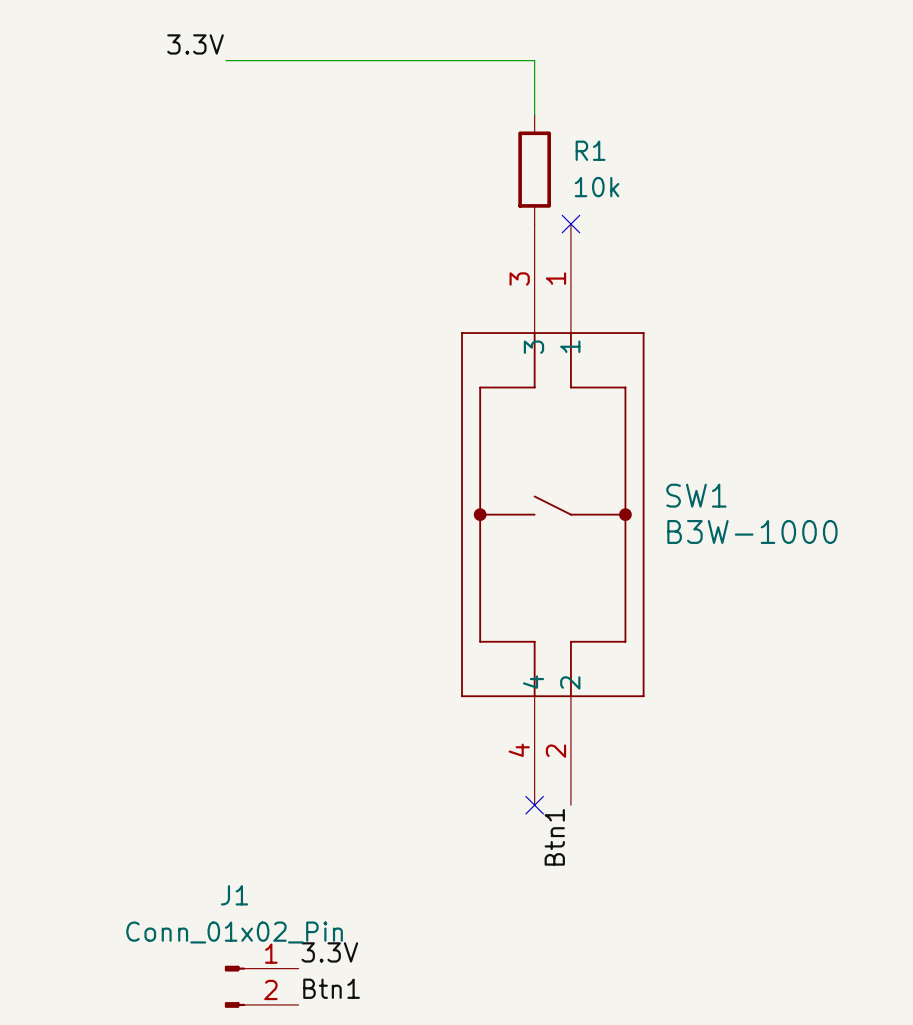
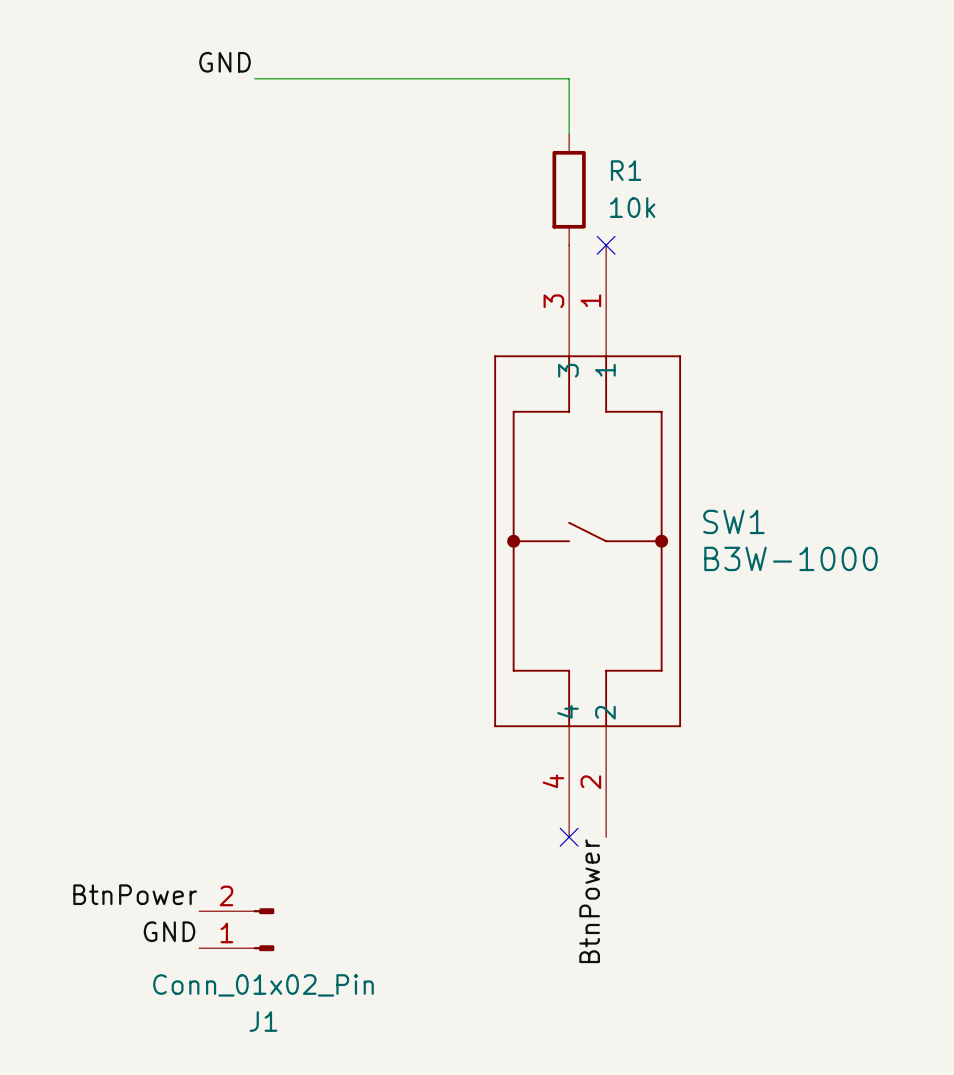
label: 3.3V (195, 44) -> GND (225, 62)
label: Btn1 (554, 837) -> BtnPower (589, 901)
label: none -> BtnPower (135, 894)
label: none -> GND (169, 931)
label: 3.3V (329, 952) -> none
J1 rotation: 0° (235, 986) -> 180° (263, 929)
J1 position: (261, 986) -> (236, 929)
label: Btn1 (331, 988) -> none

